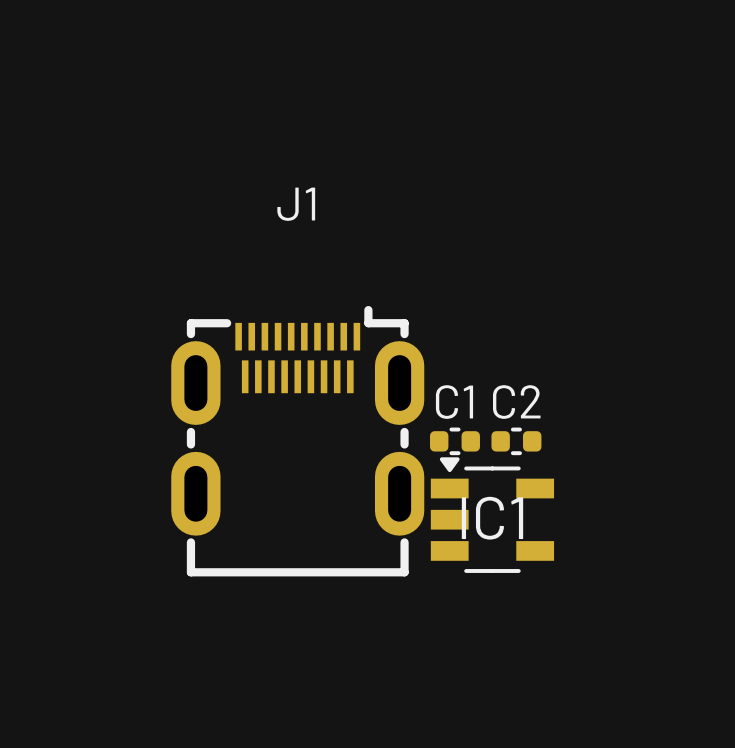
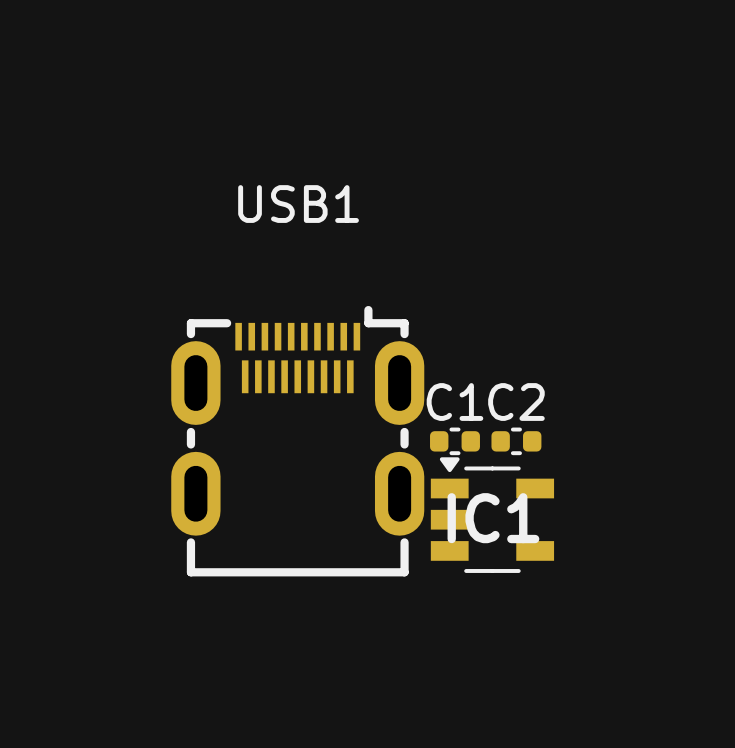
J1 name: J1 (296, 204) -> USB1 (298, 204)

